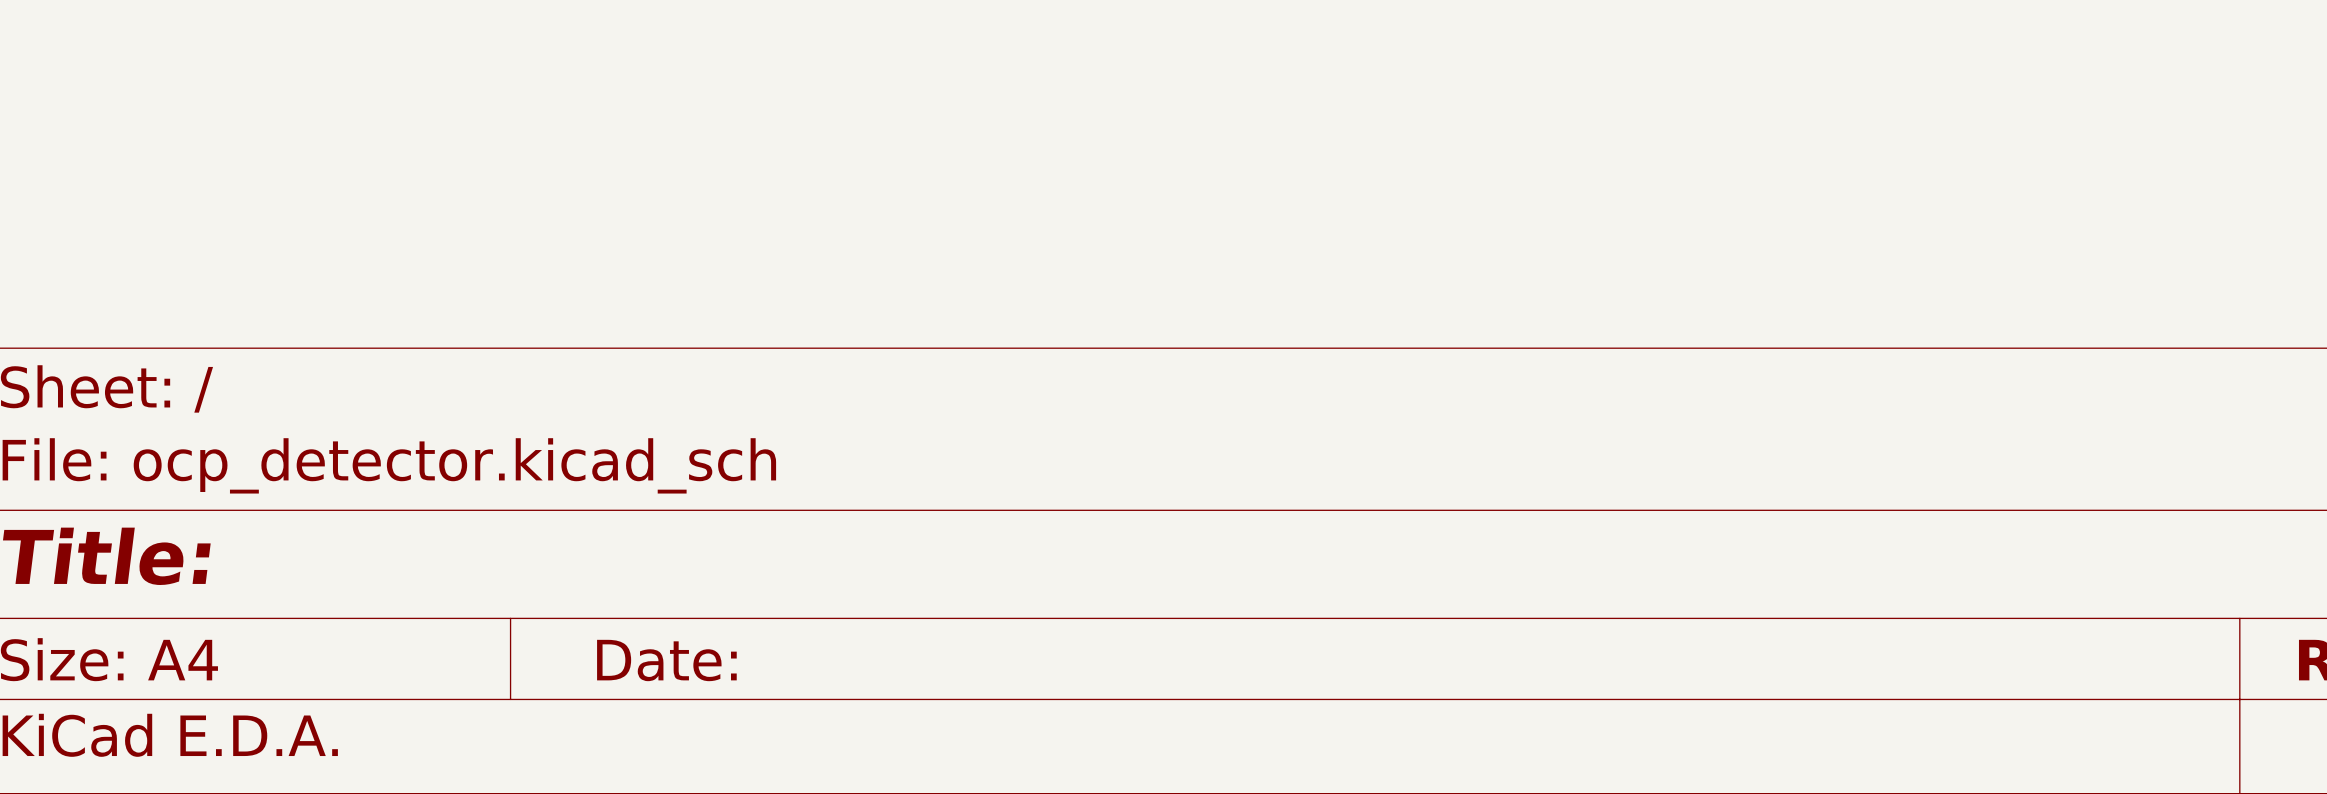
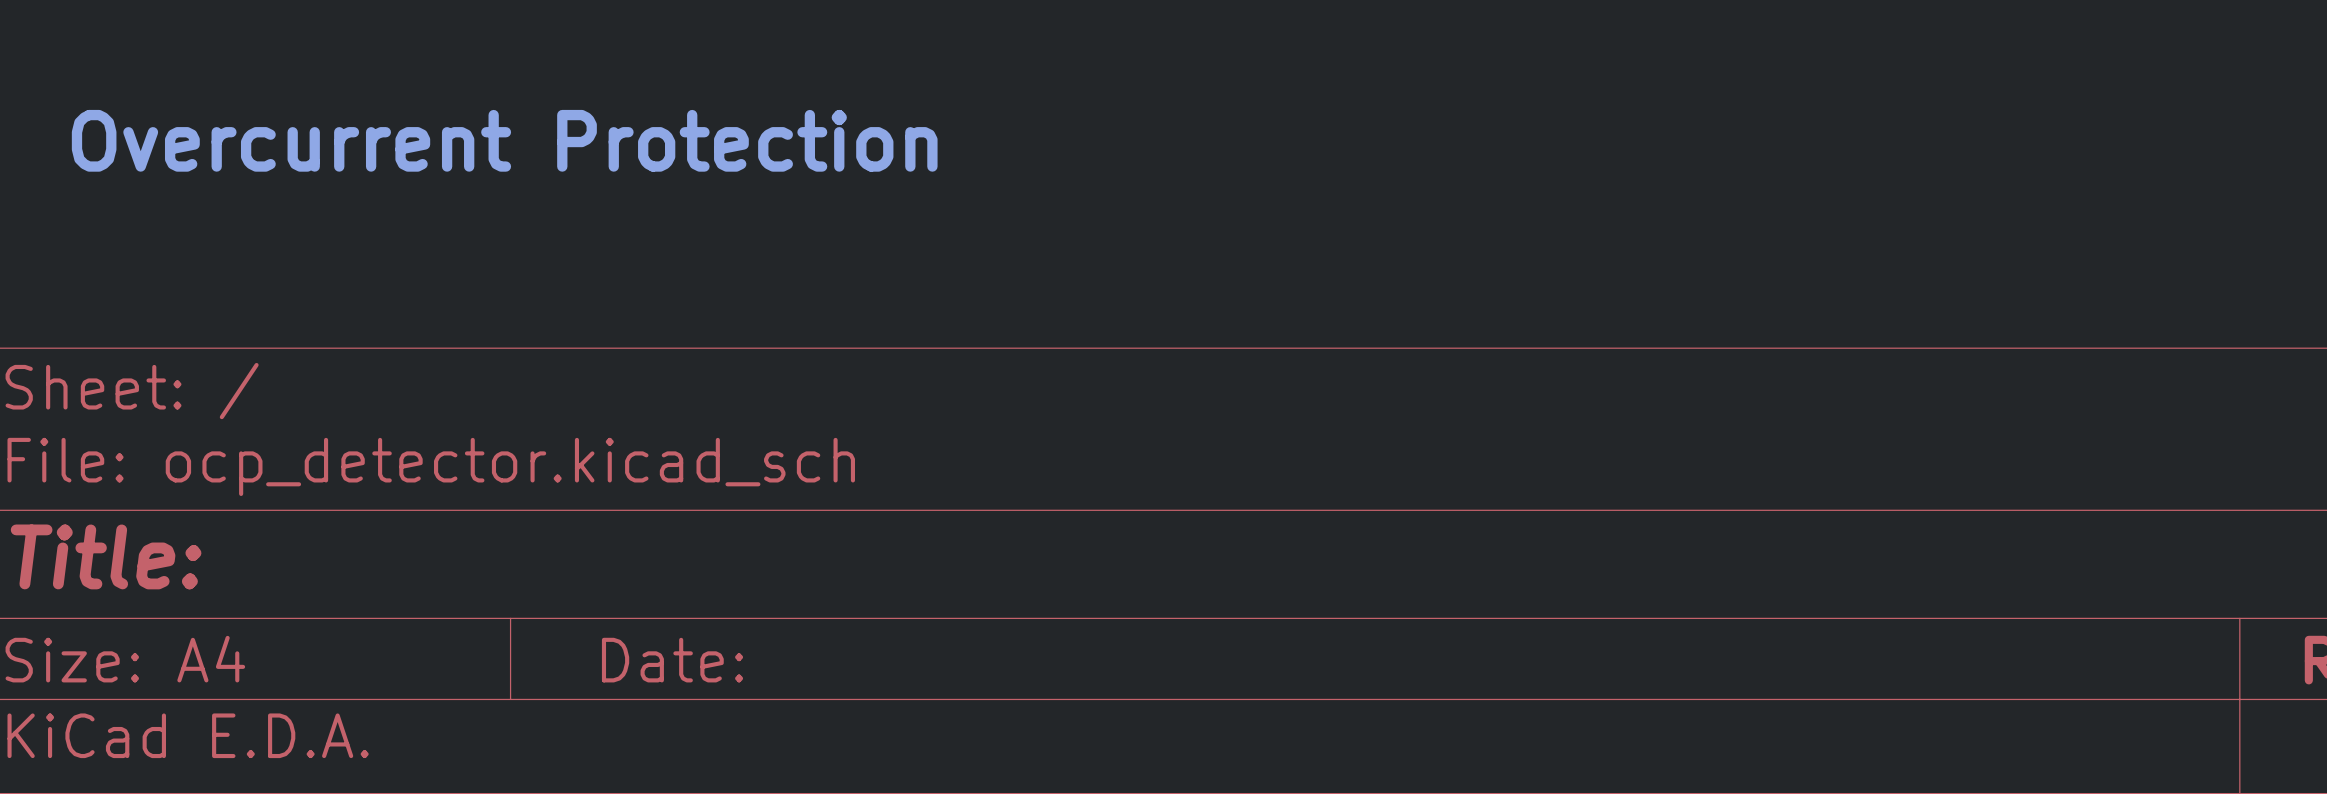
text: none -> Overcurrent Protection (504, 140)

